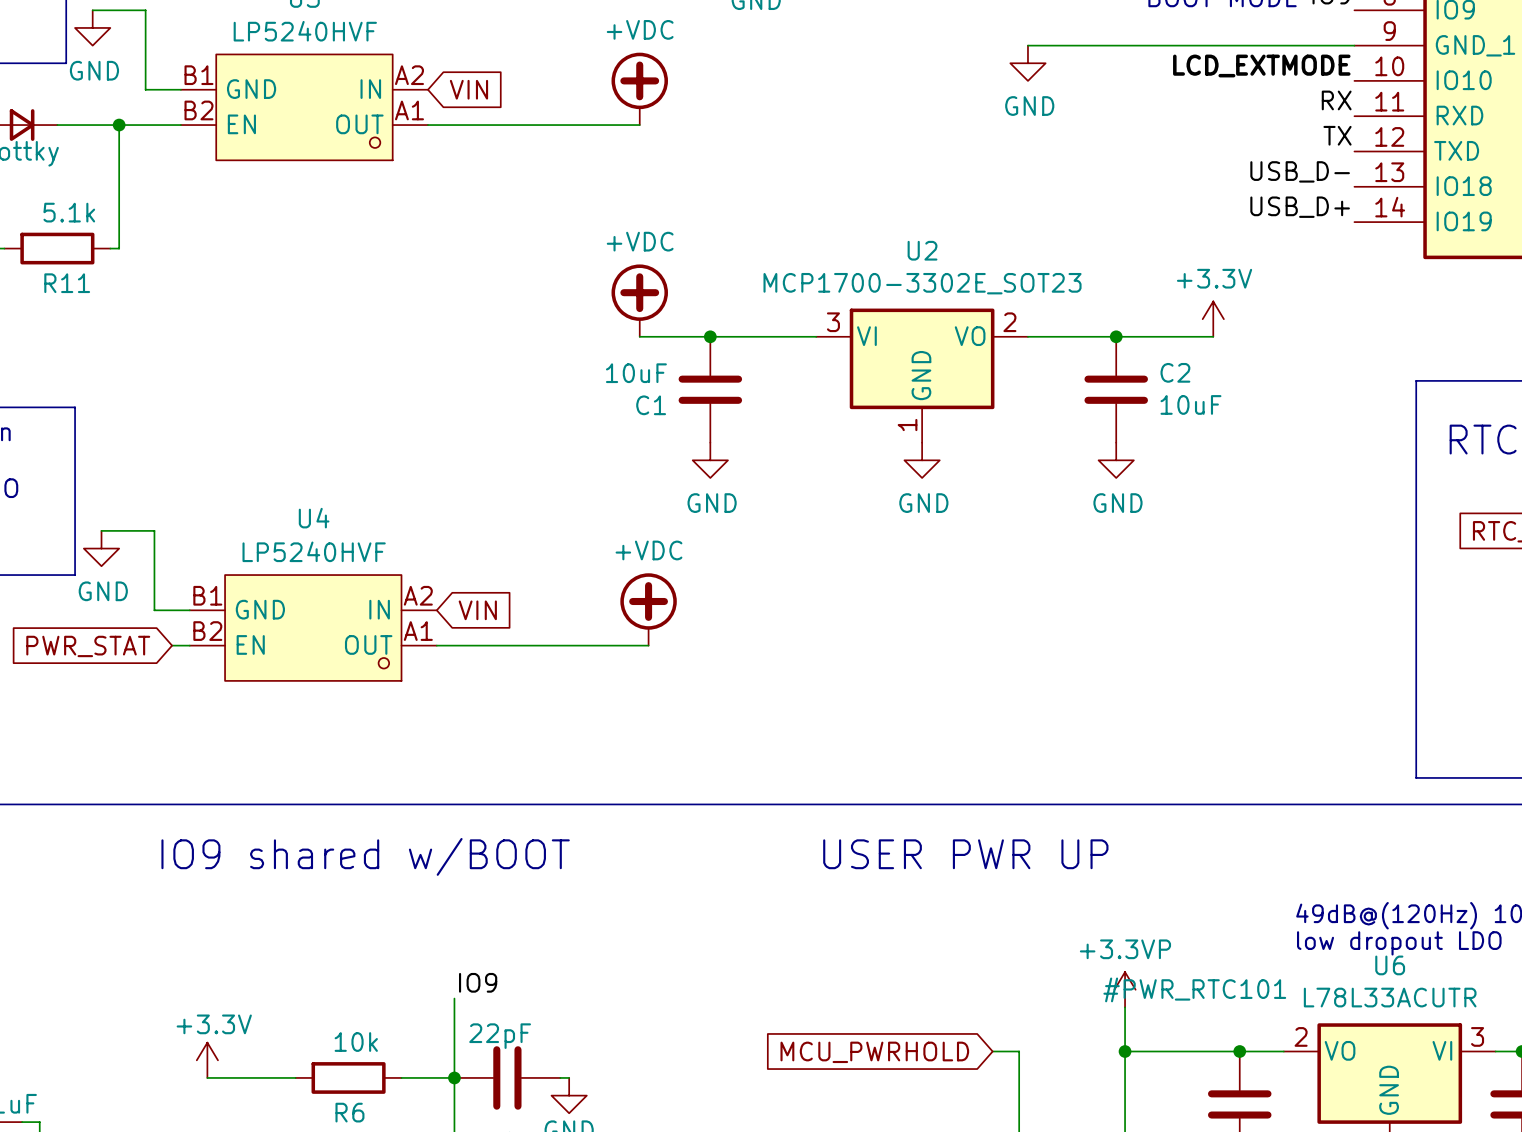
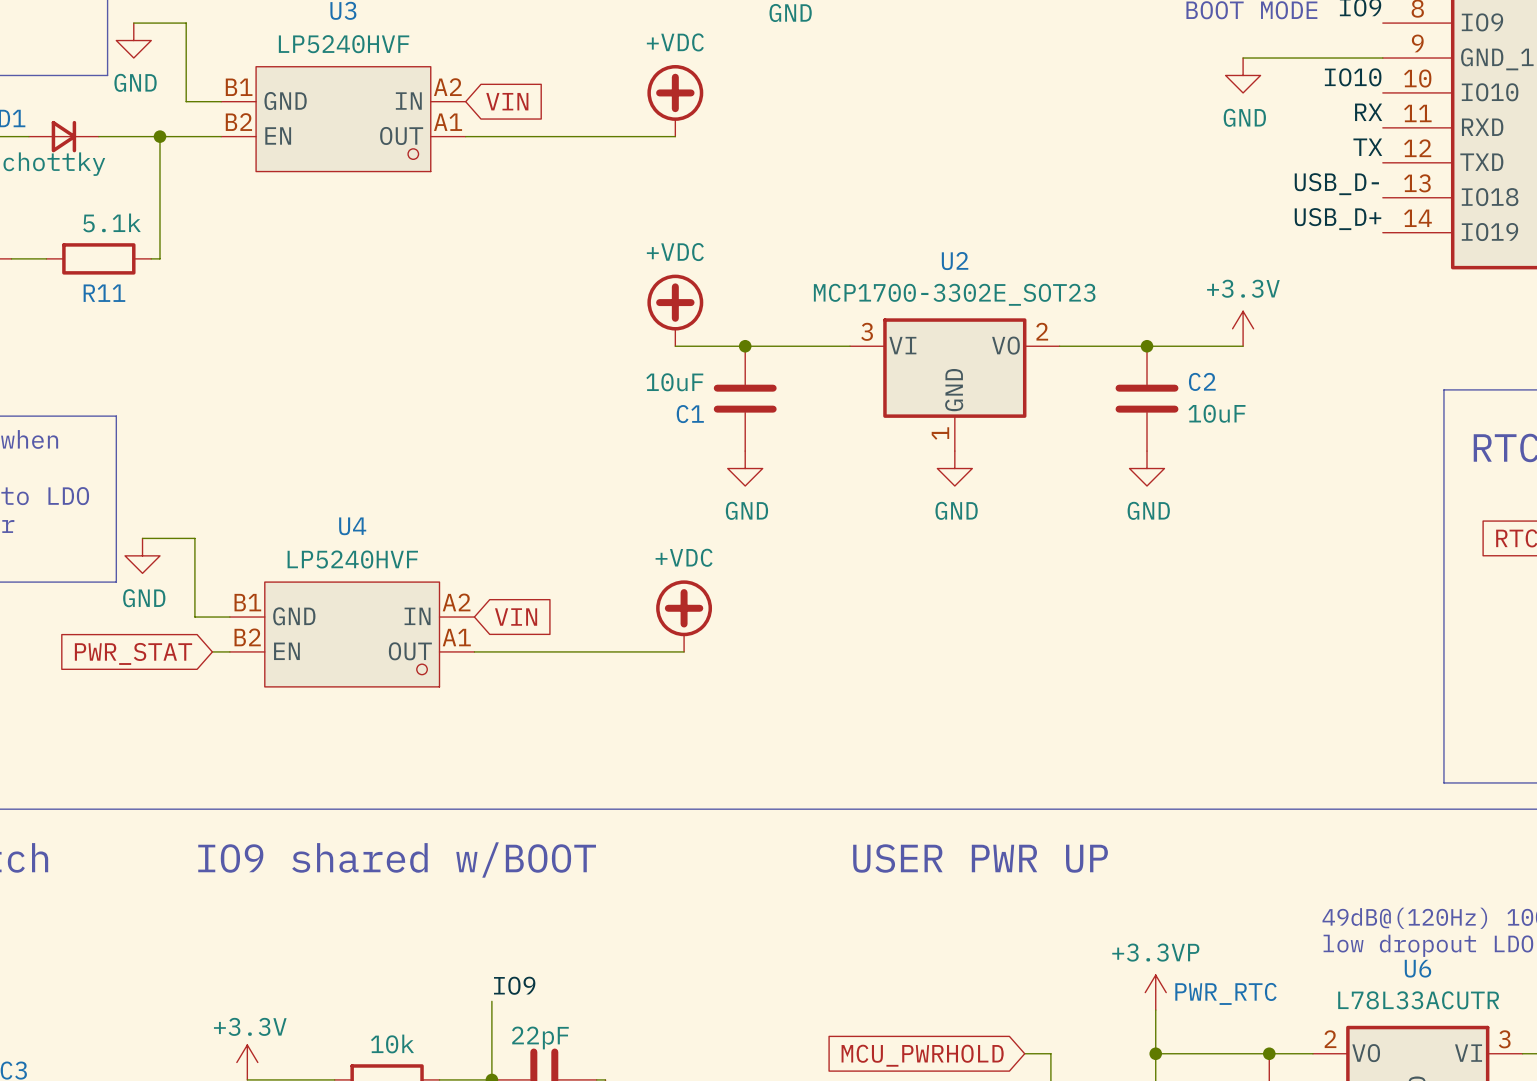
wire: (1027, 45) (1213, 45) -> none
power symbol position: GND (1027, 63) -> GND (1243, 75)
label: LCD_EXTMODE (1261, 66) -> IO10 (1353, 77)
#PWR_RTC101 name: #PWR_RTC101 (1194, 989) -> PWR_RTC (1225, 993)

